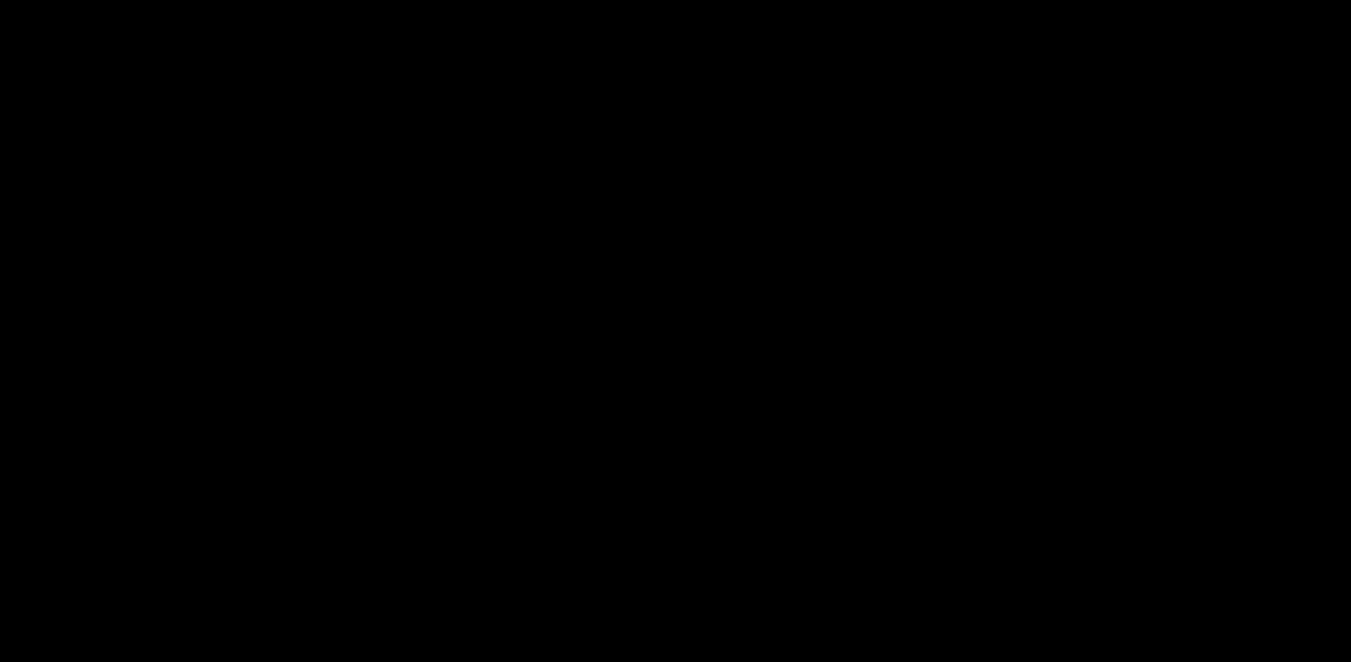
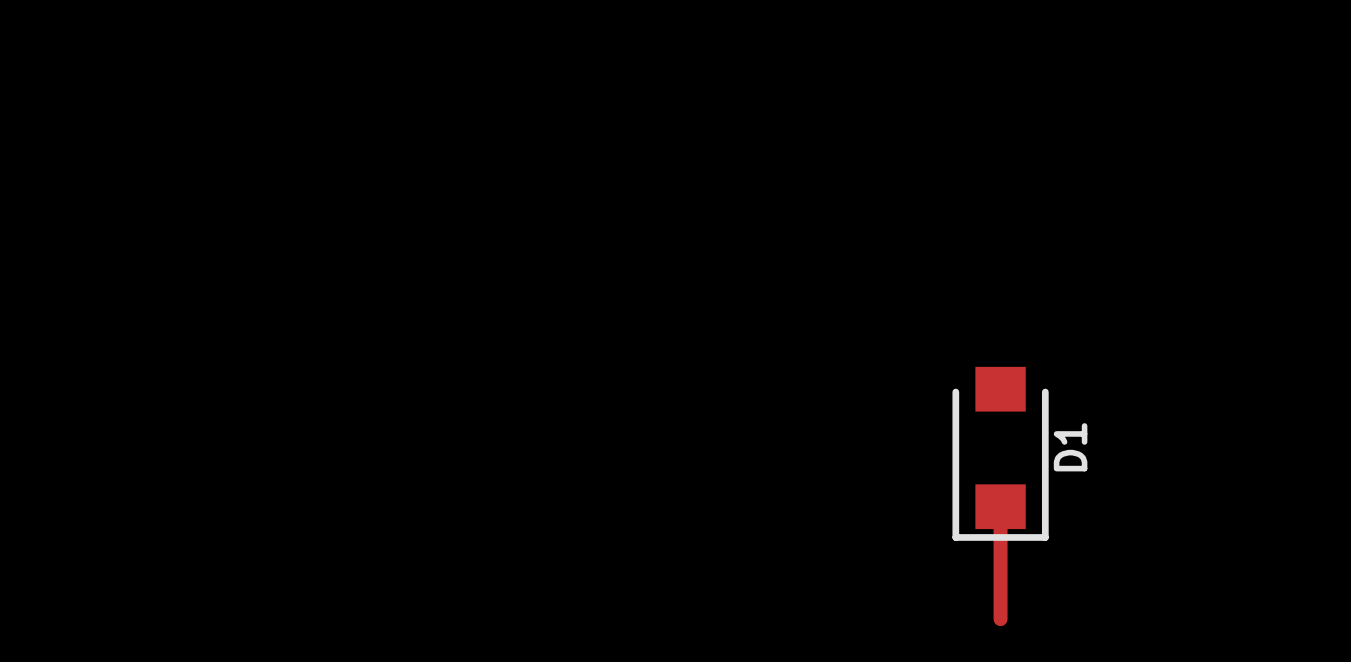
D1: none -> (1000, 453)
track: none -> (1000, 506) (1000, 619)

